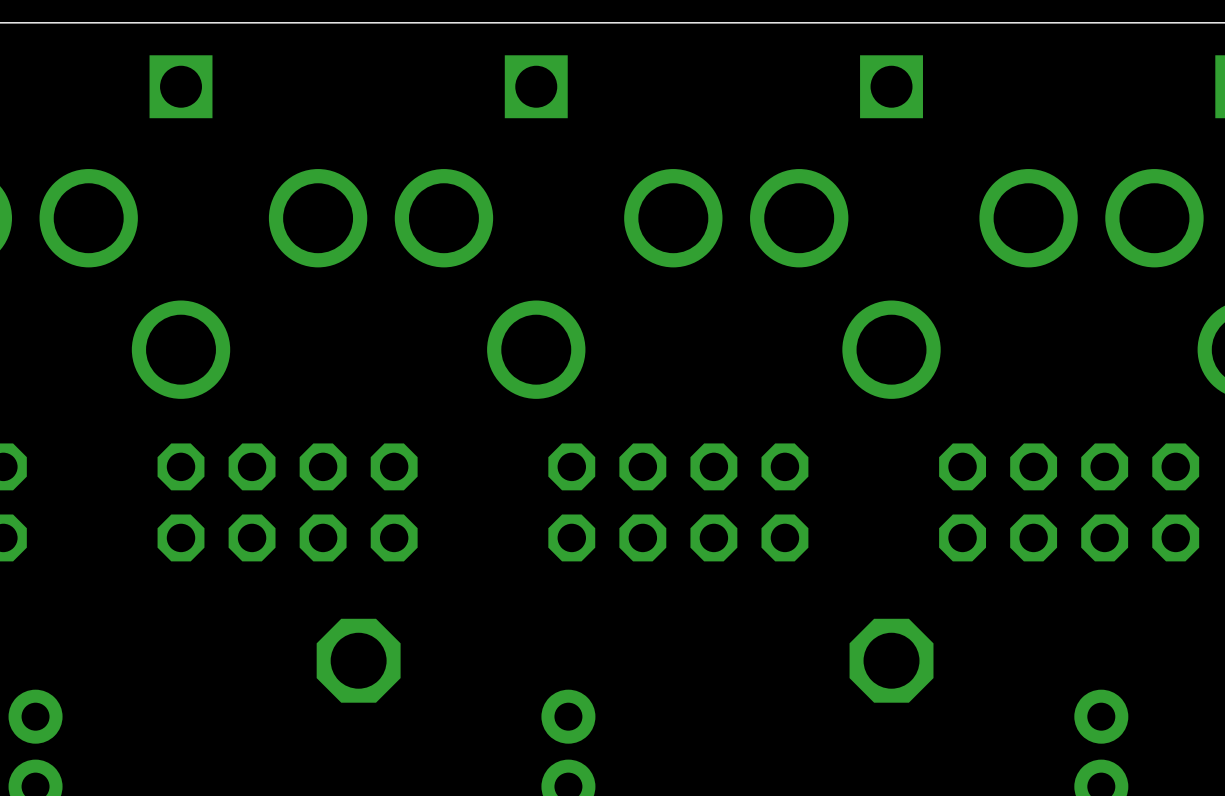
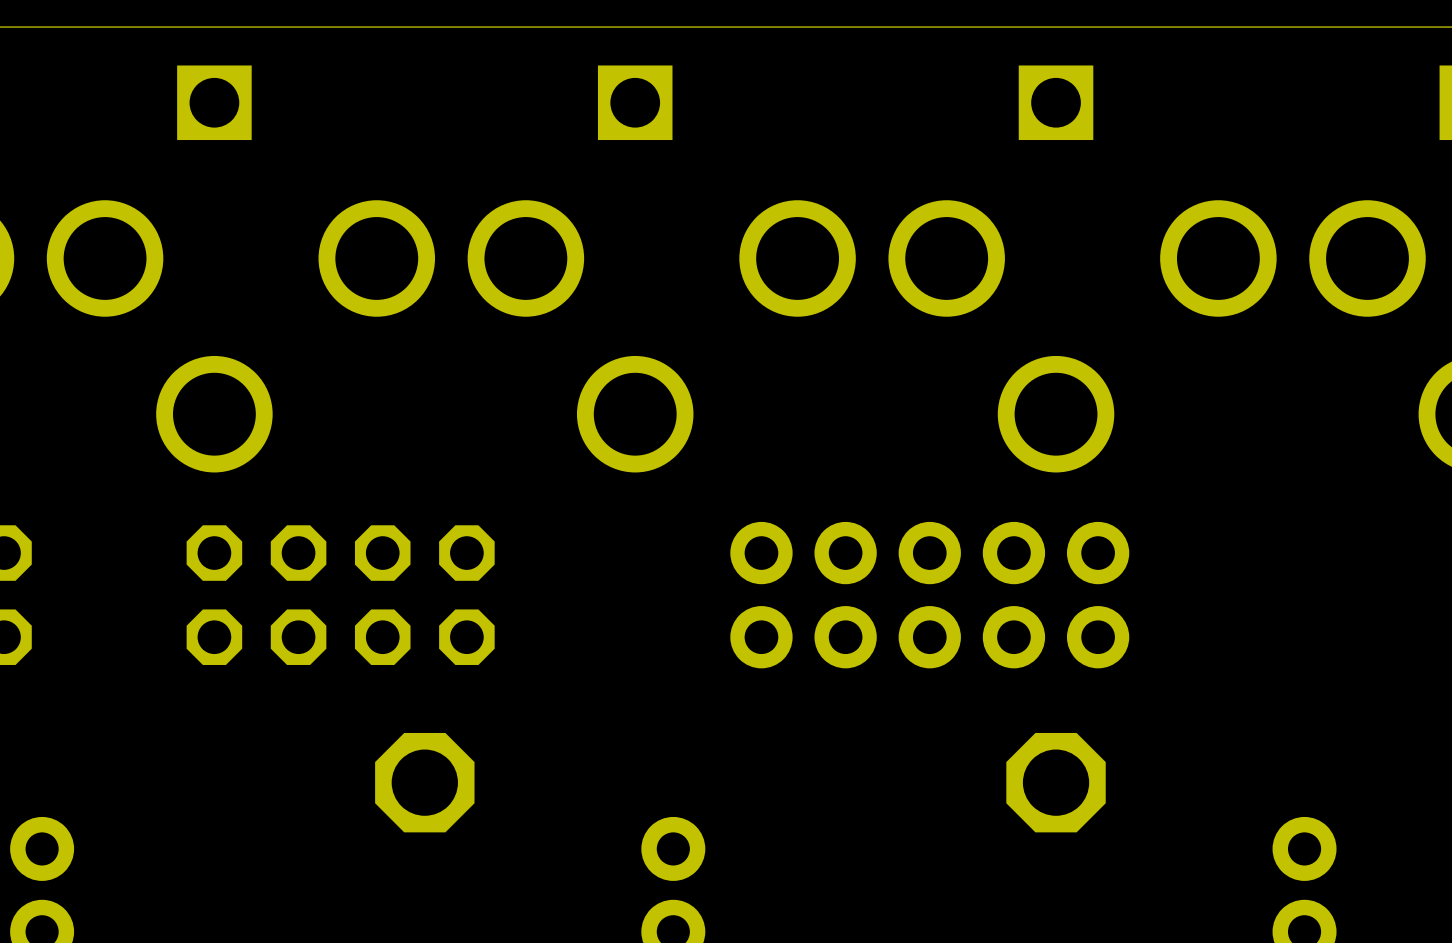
part: none -> (803, 553)
part: (678, 502) -> none
part: none -> (929, 595)
part: none -> (1013, 595)
part: none -> (1098, 595)
part: (1069, 502) -> none
part: none -> (803, 637)

